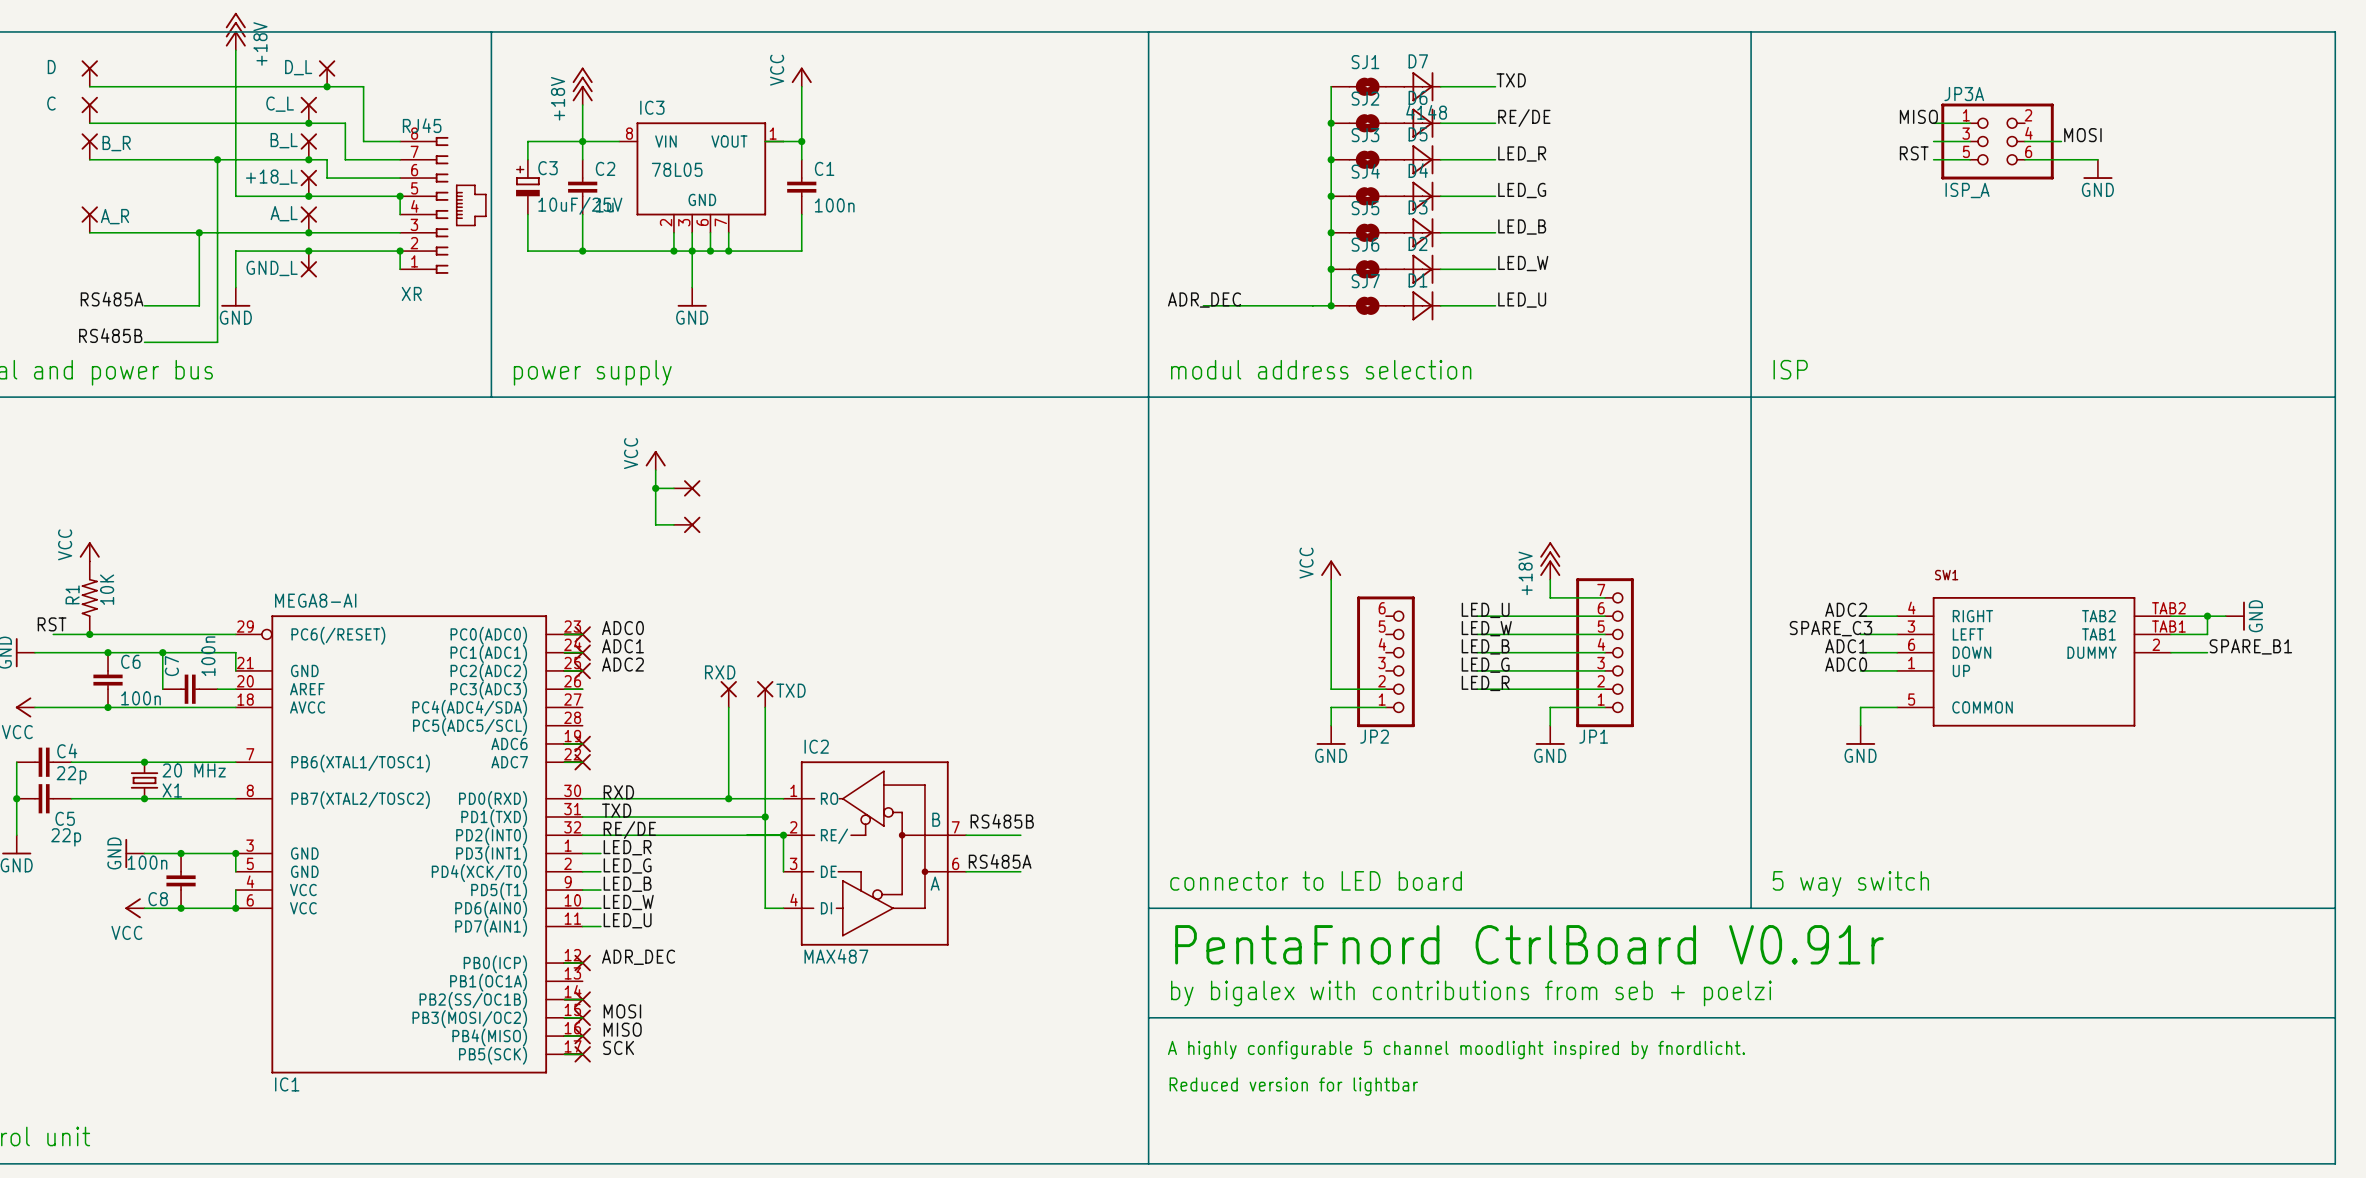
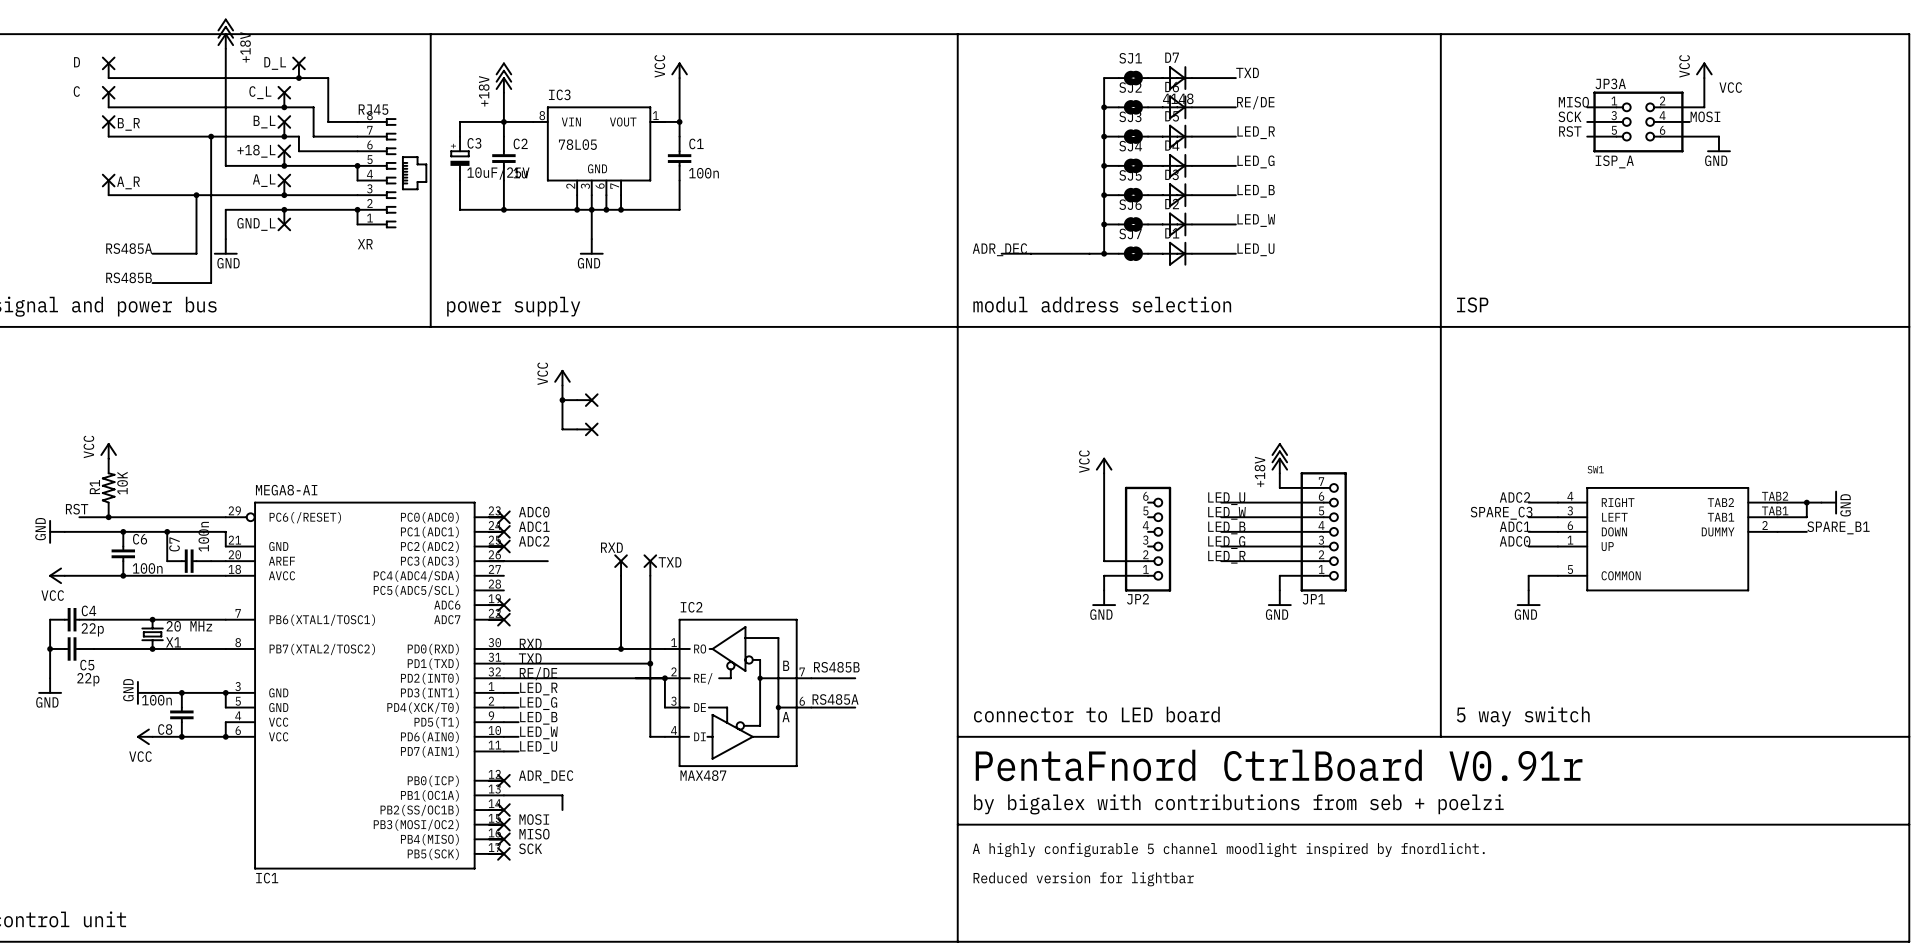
power symbol: none -> VCC (1704, 70)
wire: none -> (1704, 78) (1704, 107) (1660, 107)
label: none -> VCC (1730, 87)
label: none -> SCK (1569, 116)
wire: none -> (503, 561) (547, 561)
wire: none -> (503, 795) (562, 795) (562, 810)

